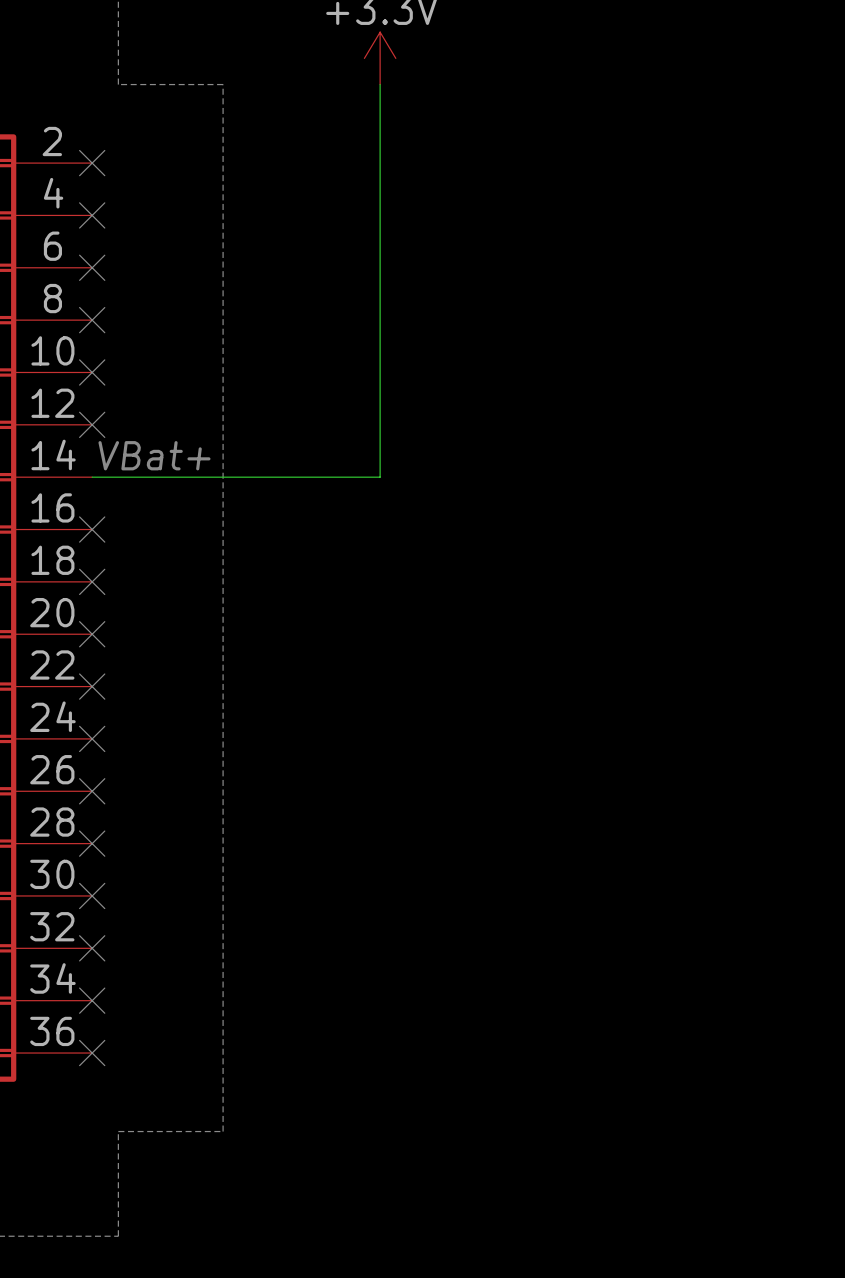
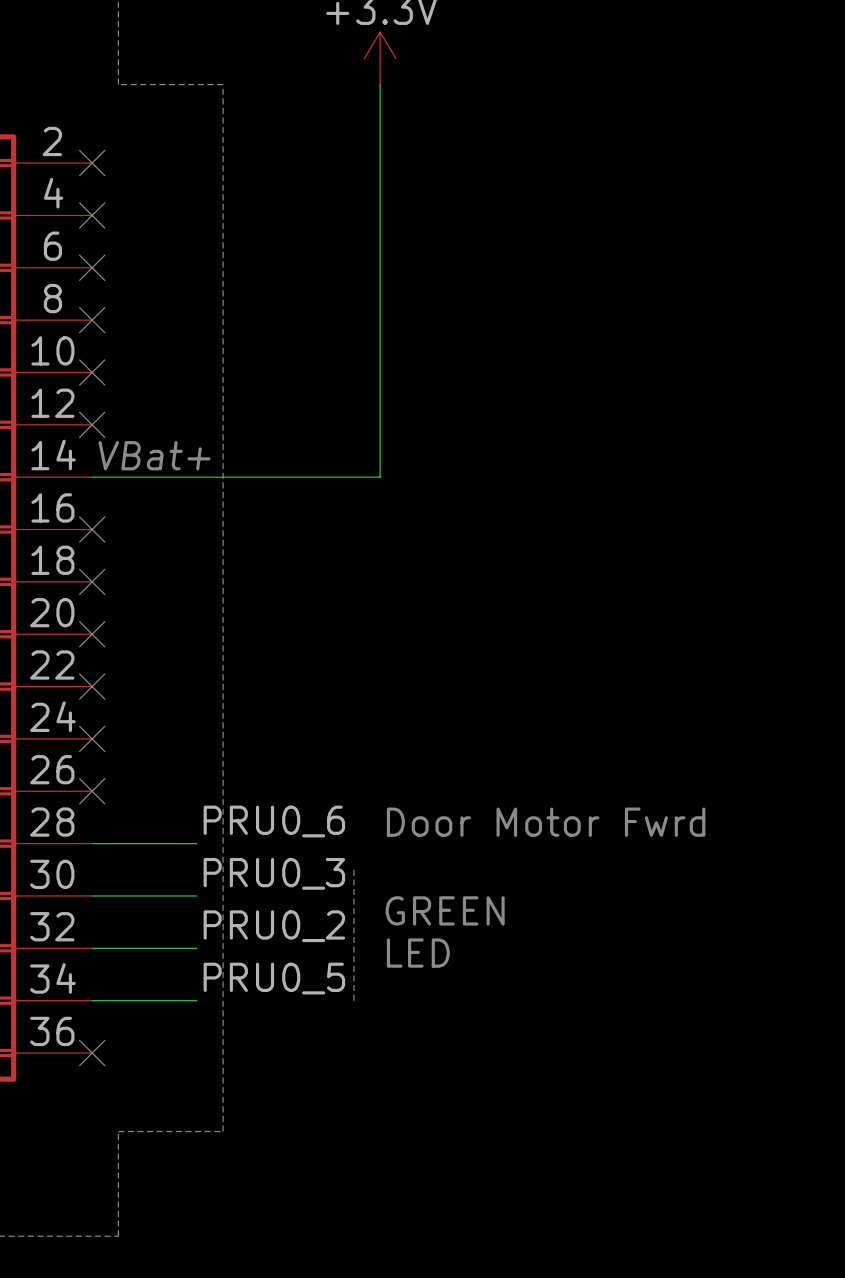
label: none -> PRU0_6 (274, 821)
text: none -> Door Motor Fwrd (546, 822)
wire: none -> (92, 843) (196, 843)
no-connect mark: (92, 843) -> none
line: none -> (353, 869) (353, 1000)
label: none -> PRU0_3 (274, 873)
wire: none -> (92, 895) (196, 895)
no-connect mark: (92, 895) -> none
text: none -> GREEN (445, 910)
label: none -> PRU0_2 (274, 926)
wire: none -> (92, 948) (196, 948)
no-connect mark: (92, 948) -> none
text: none -> LED (418, 953)
label: none -> PRU0_5 (274, 978)
wire: none -> (92, 1000) (196, 1000)
no-connect mark: (92, 1000) -> none

